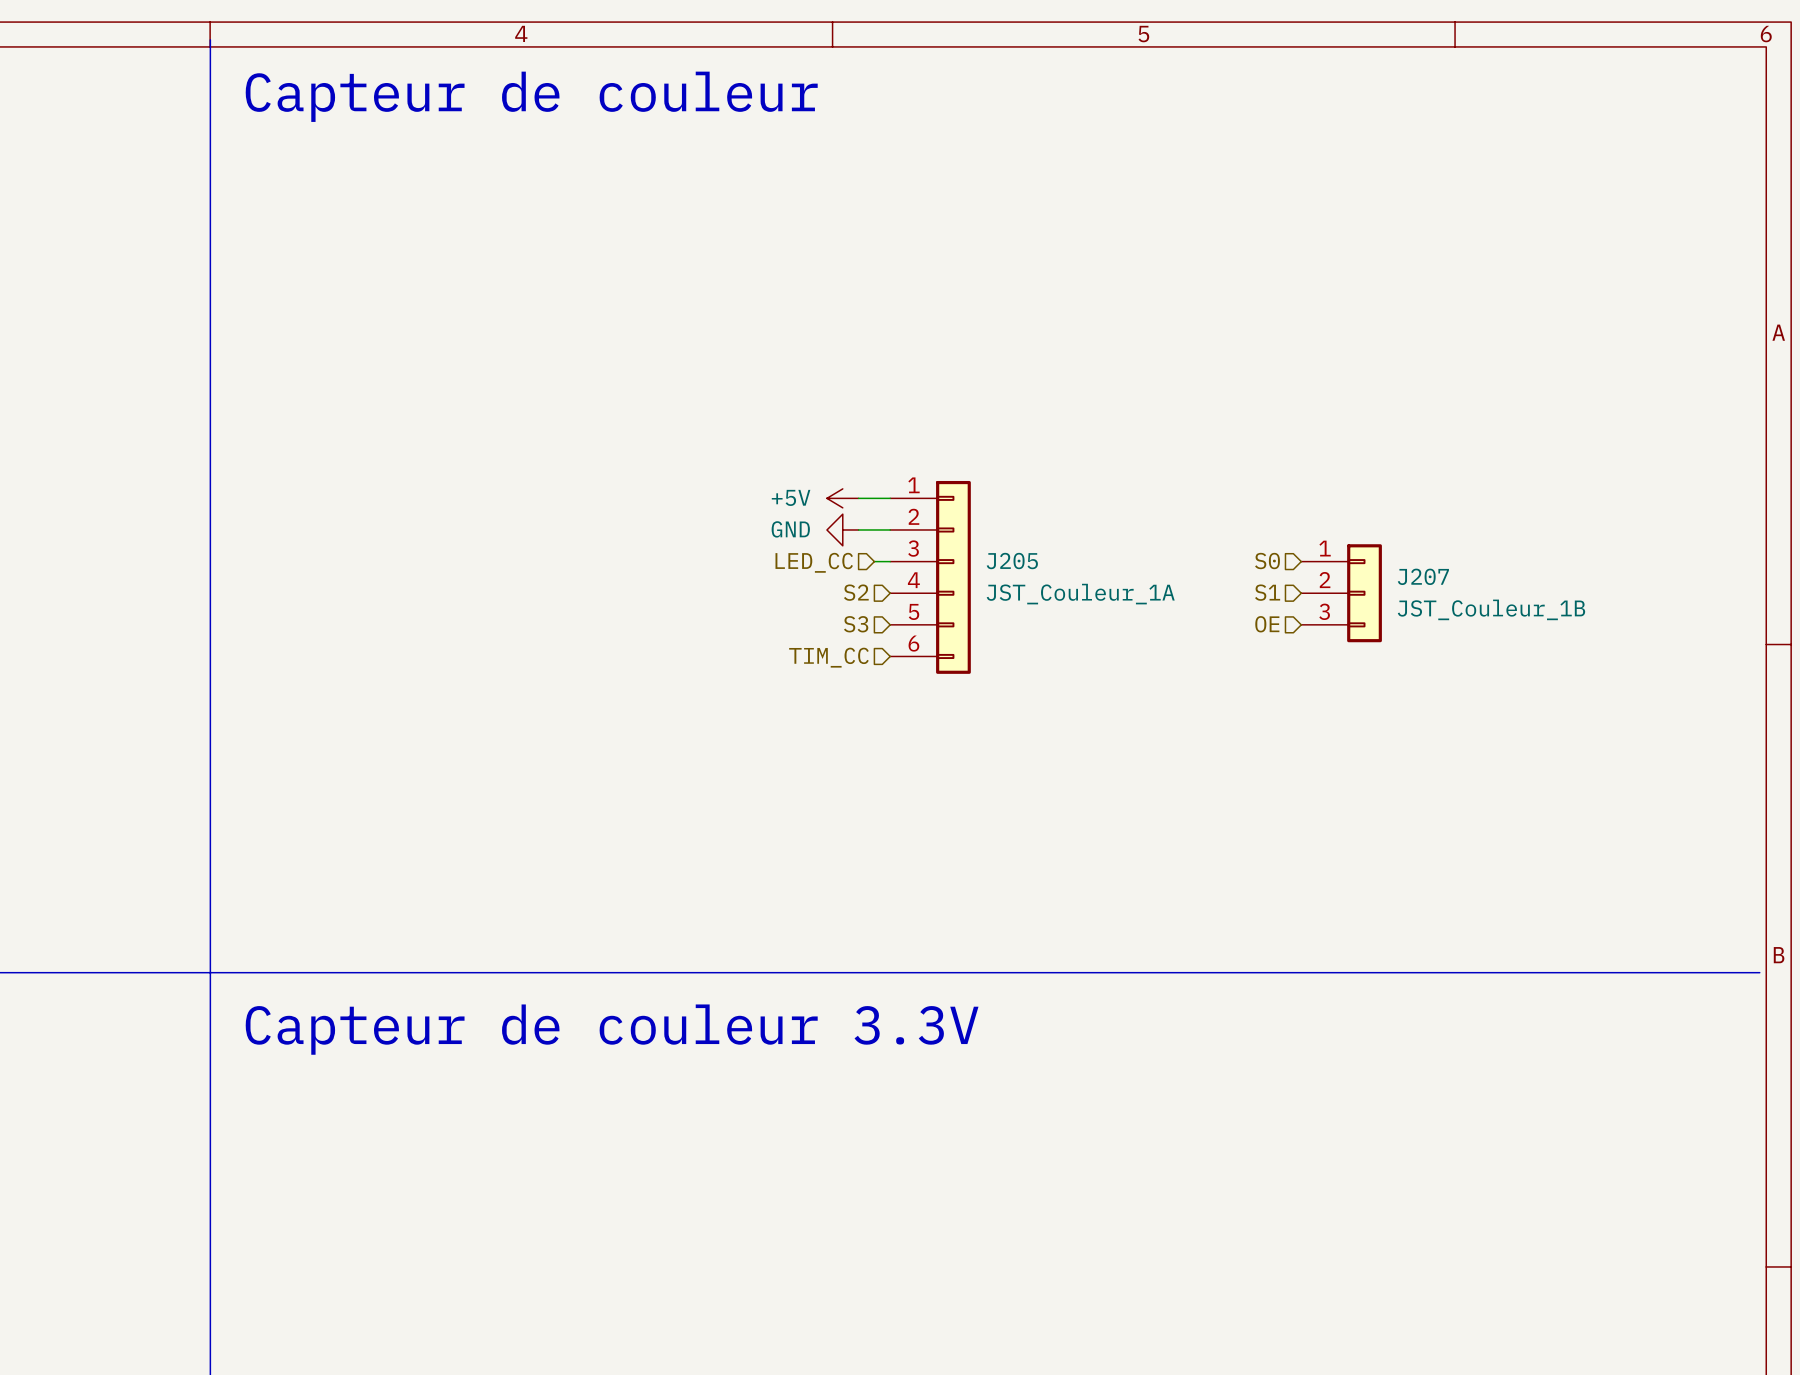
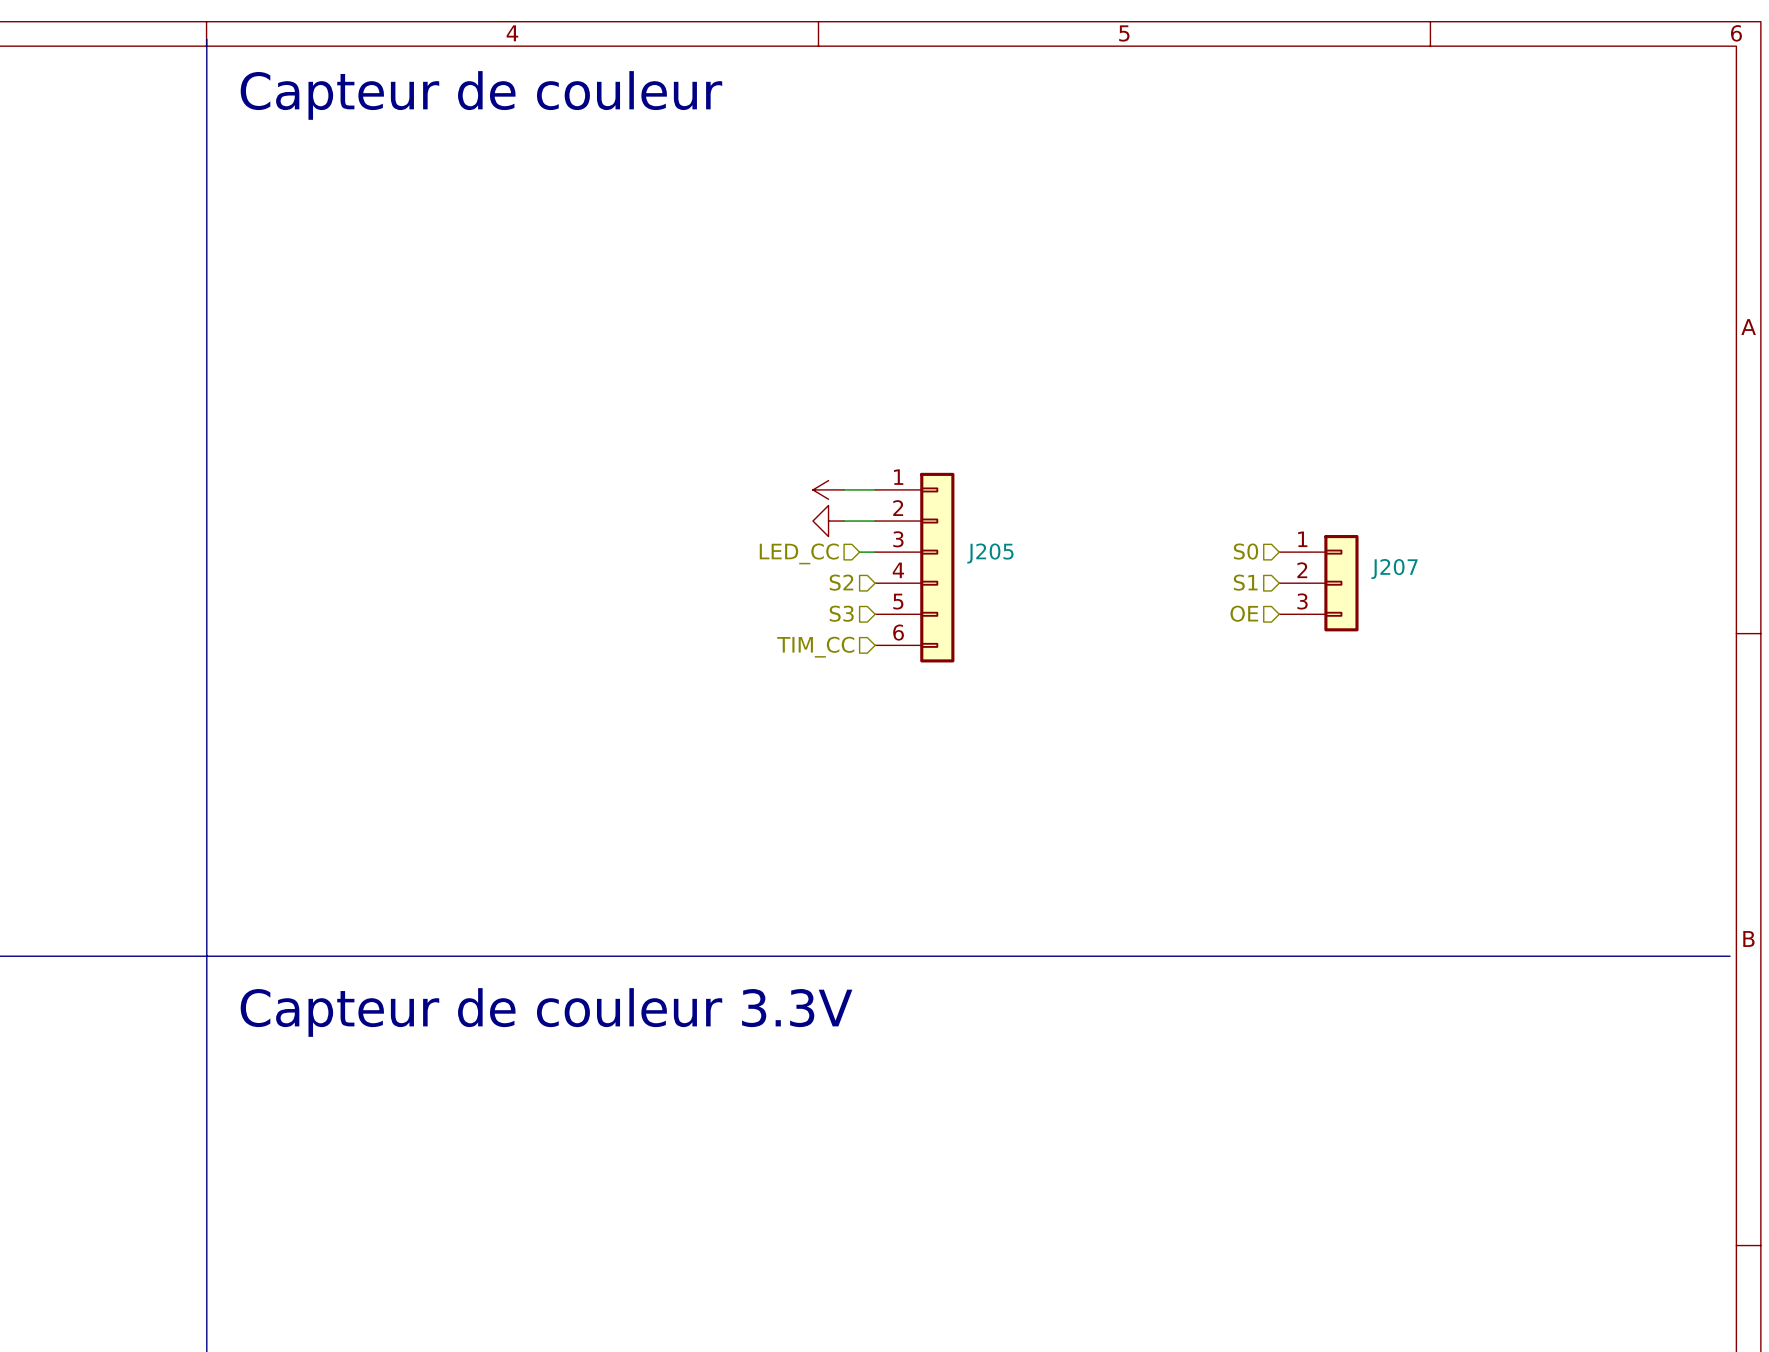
power symbol text: +5V (791, 497) -> none
power symbol text: GND (790, 529) -> none
J205 value: JST_Couleur_1A (1080, 594) -> none
J207 value: JST_Couleur_1B (1491, 609) -> none

